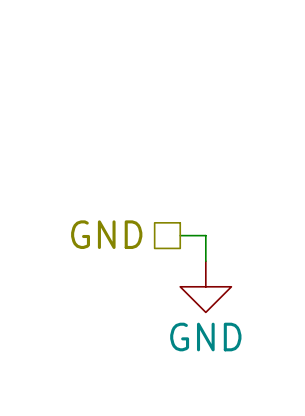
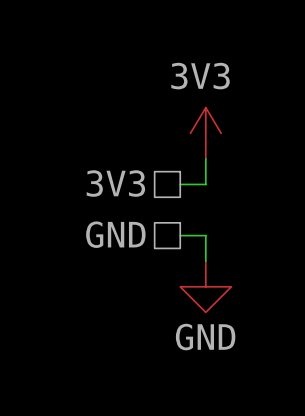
power symbol: none -> 3V3 (205, 133)
wire: none -> (205, 158) (205, 184) (180, 184)
hierarchical label: none -> 3V3 (115, 183)

